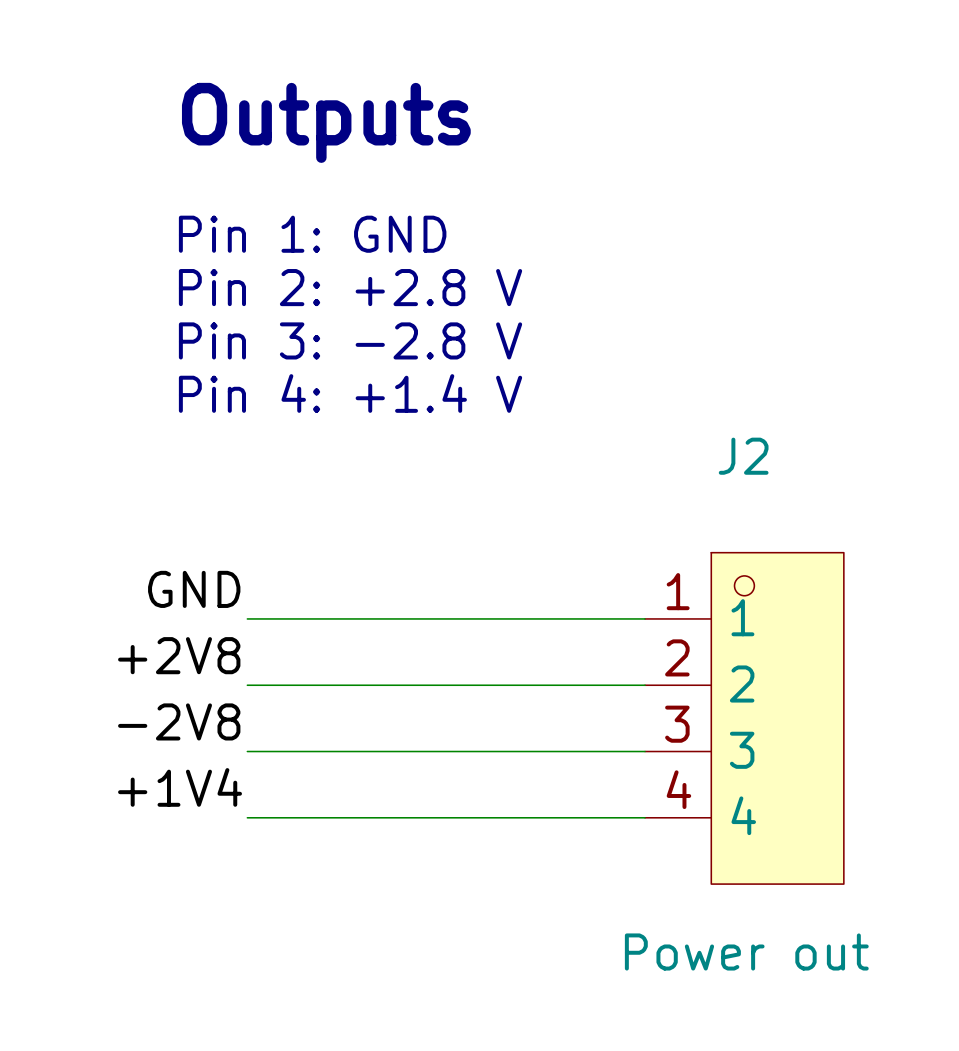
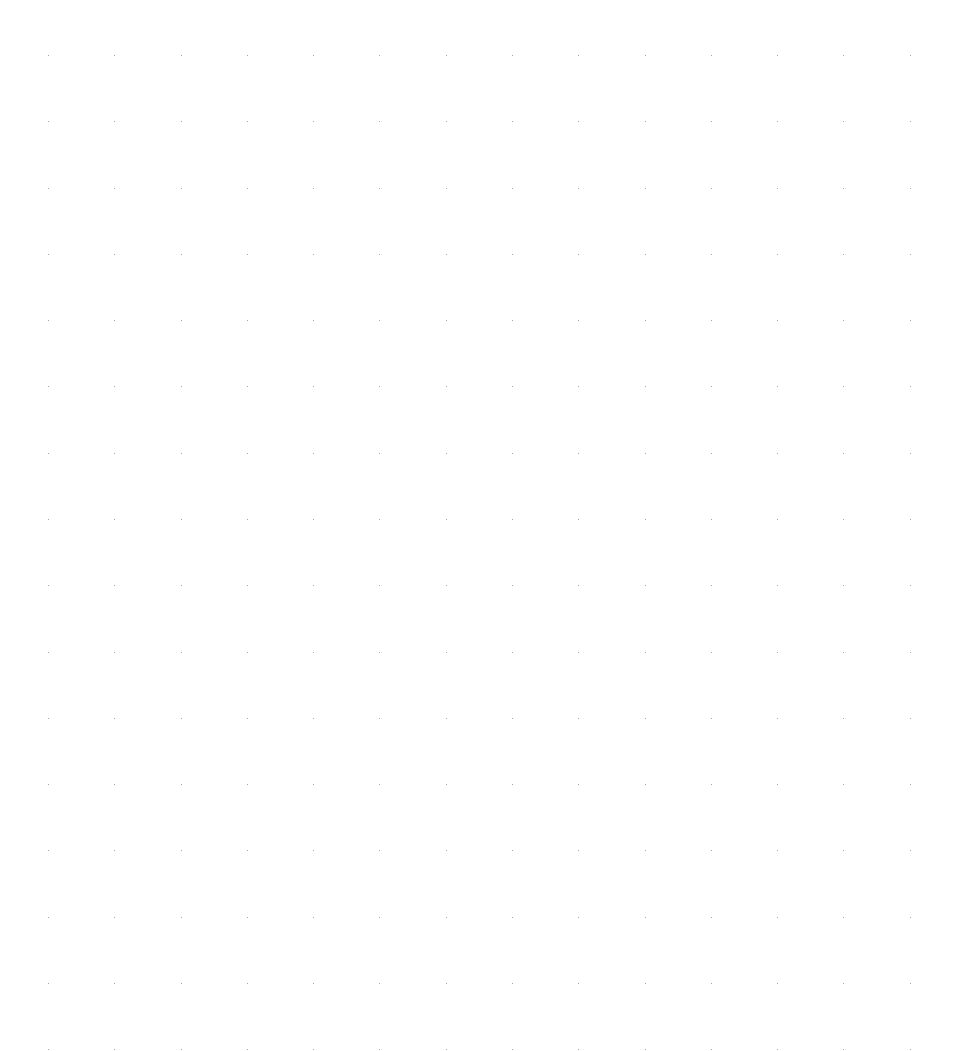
text: Outputs (326, 122) -> none
text: Pin 1: GND (312, 234) -> none
text: Pin 2: +2.8 V (350, 287) -> none
text: Pin 3: -2.8 V (350, 340) -> none
text: Pin 4: +1.4 V (350, 393) -> none
label: GND (194, 589) -> none
wire: (247, 618) (645, 618) -> none
label: +2V8 (179, 655) -> none
wire: (247, 685) (645, 685) -> none
J2: Power out (744, 718) -> none
label: -2V8 (179, 721) -> none
wire: (247, 751) (645, 751) -> none
label: +1V4 (180, 787) -> none
wire: (247, 817) (645, 817) -> none

